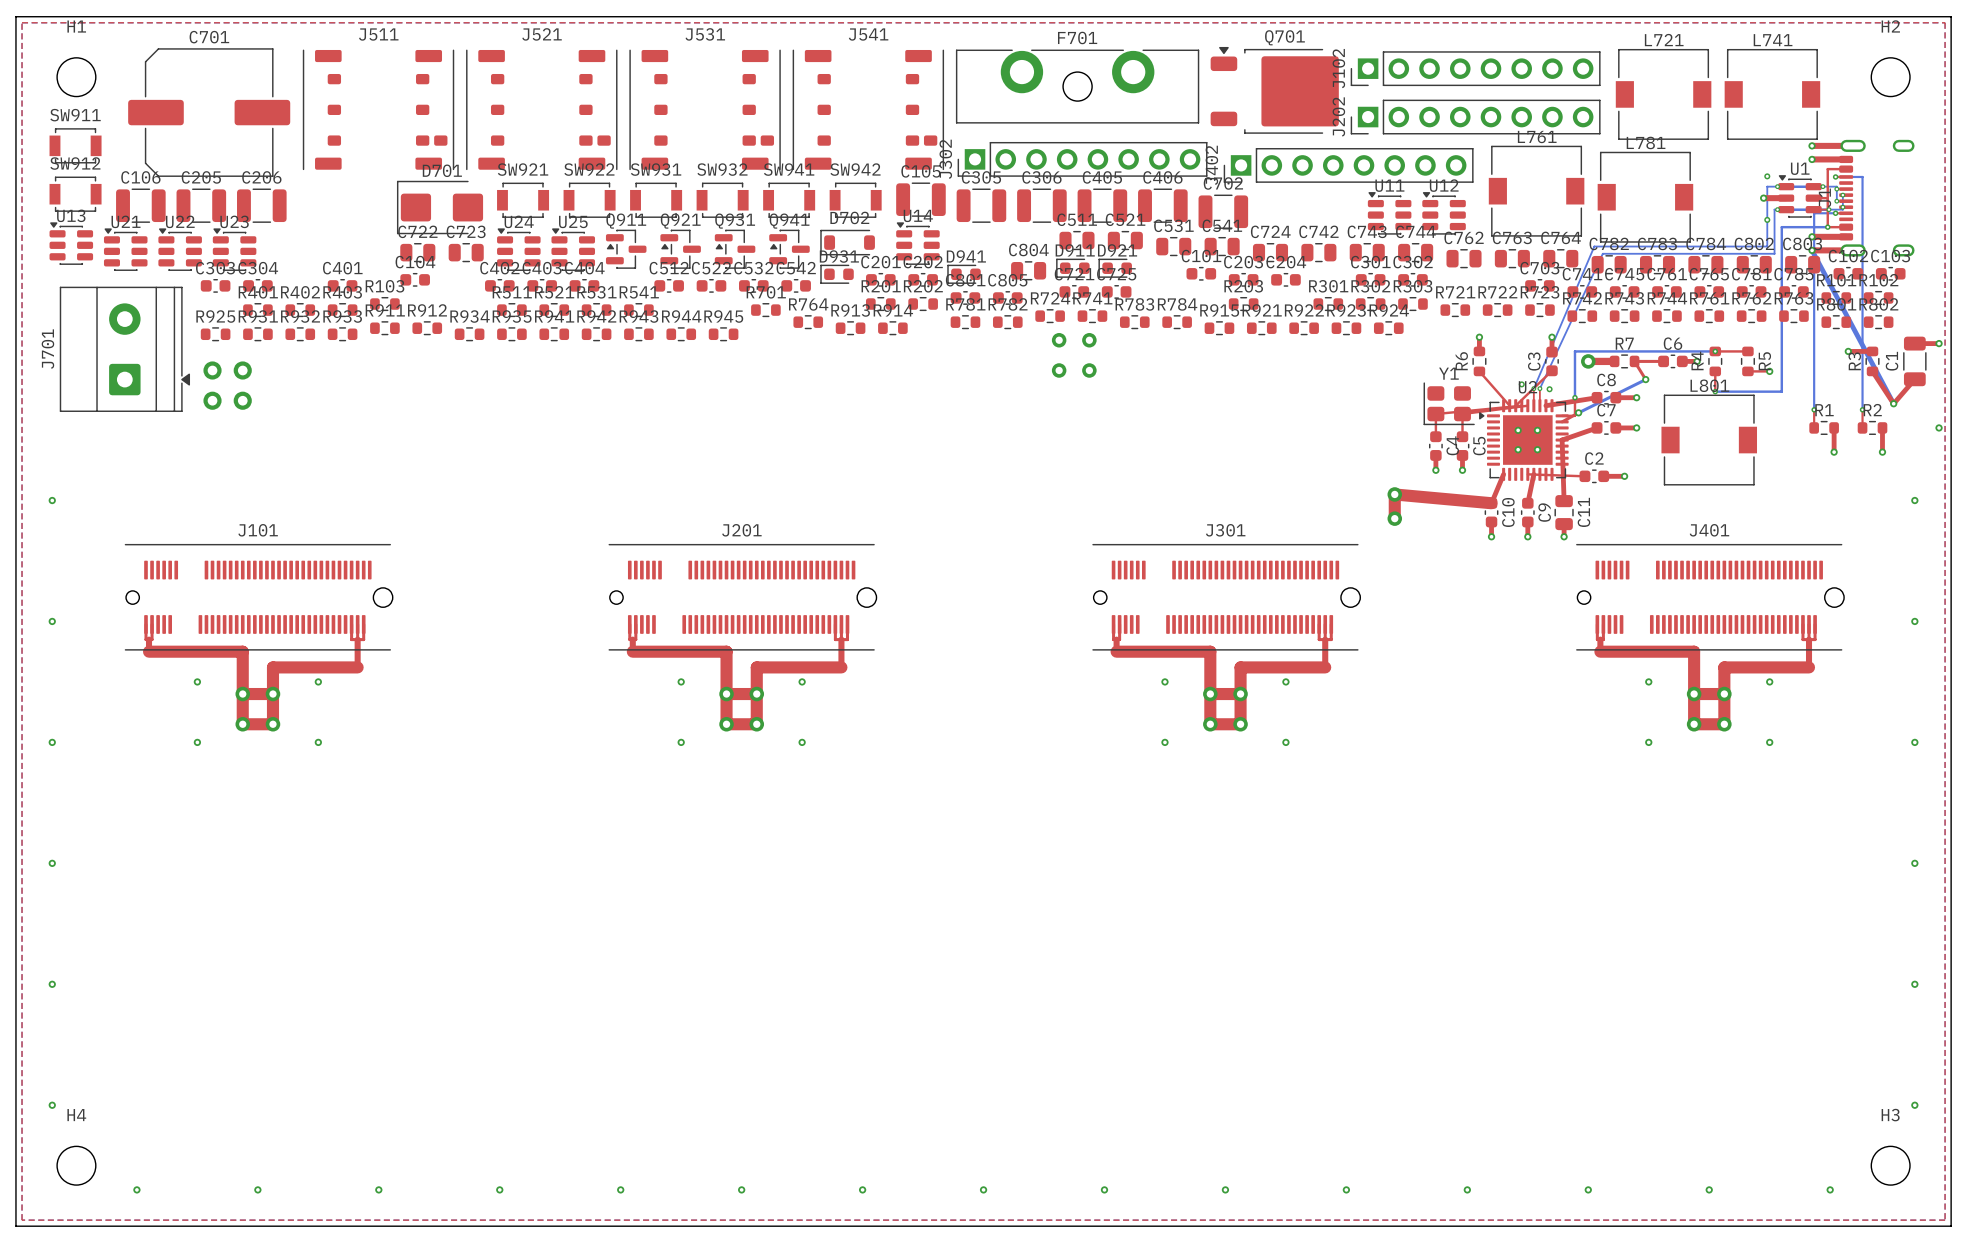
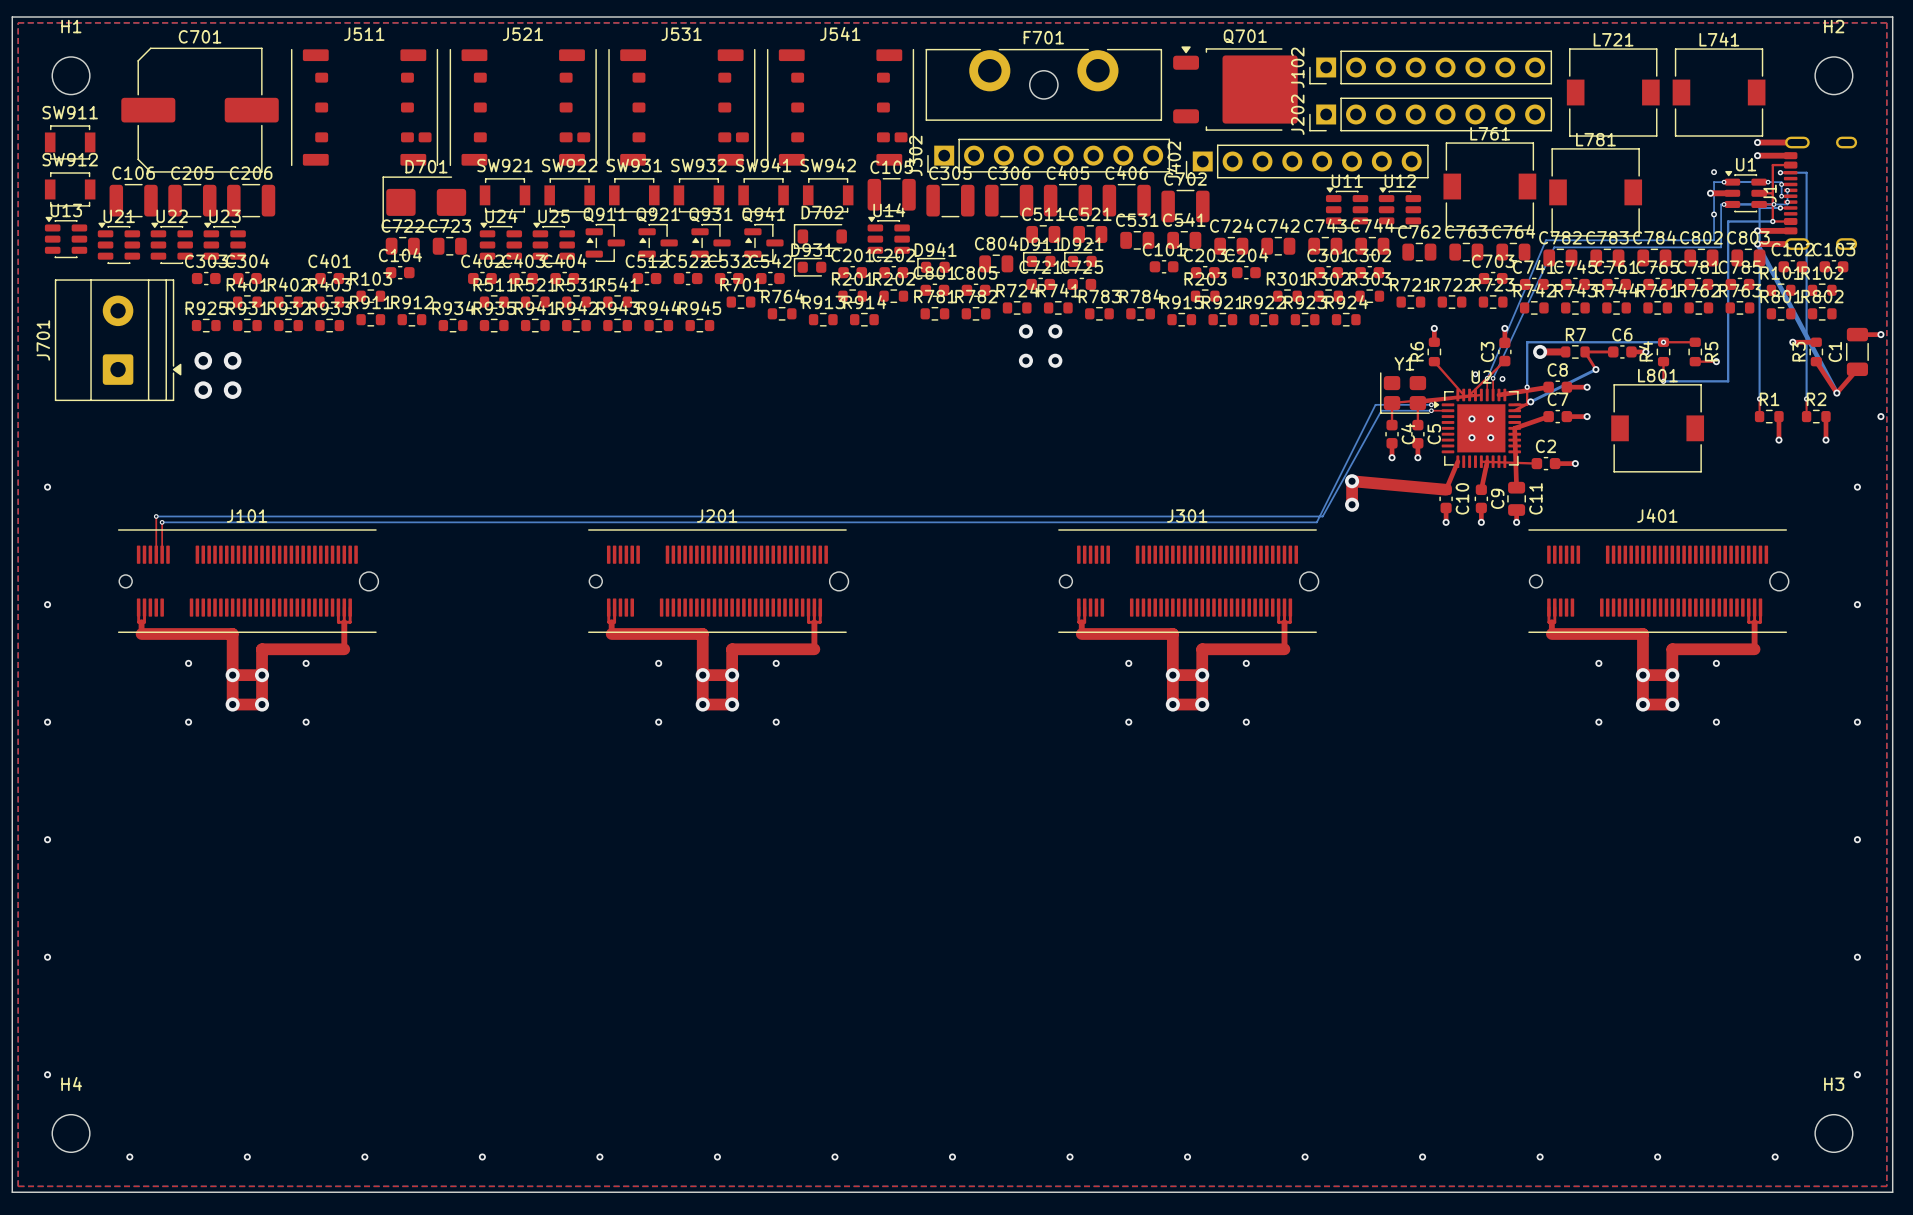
bottom track: none -> (1431, 404) (1375, 404) (1316, 522) (162, 522)
via: none -> (1431, 404)
top track: none -> (1431, 410) (1447, 410)
bottom track: none -> (1431, 410) (1381, 410) (1322, 516) (156, 516)
via: none -> (1431, 410)
top track: none -> (156, 516) (156, 554)
via: none -> (156, 516)
top track: none -> (162, 522) (162, 554)
via: none -> (162, 522)

